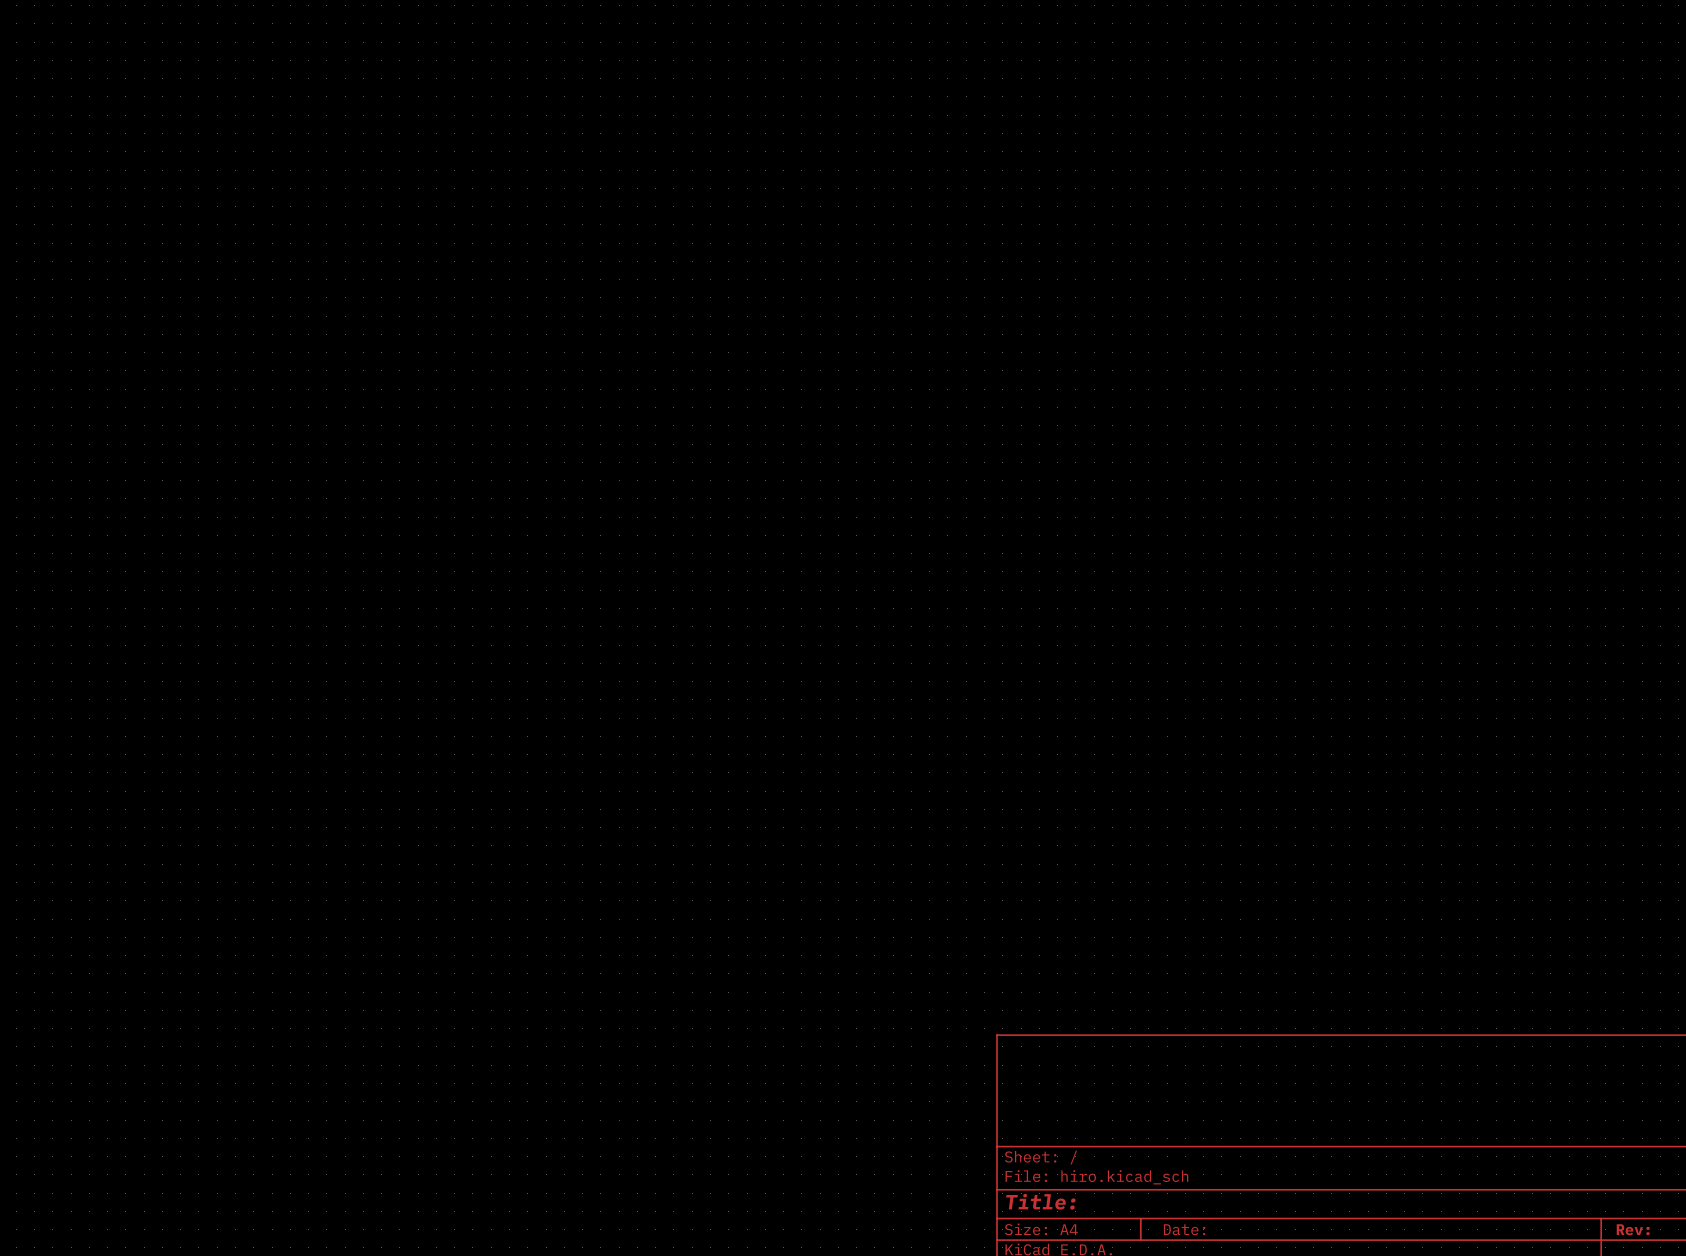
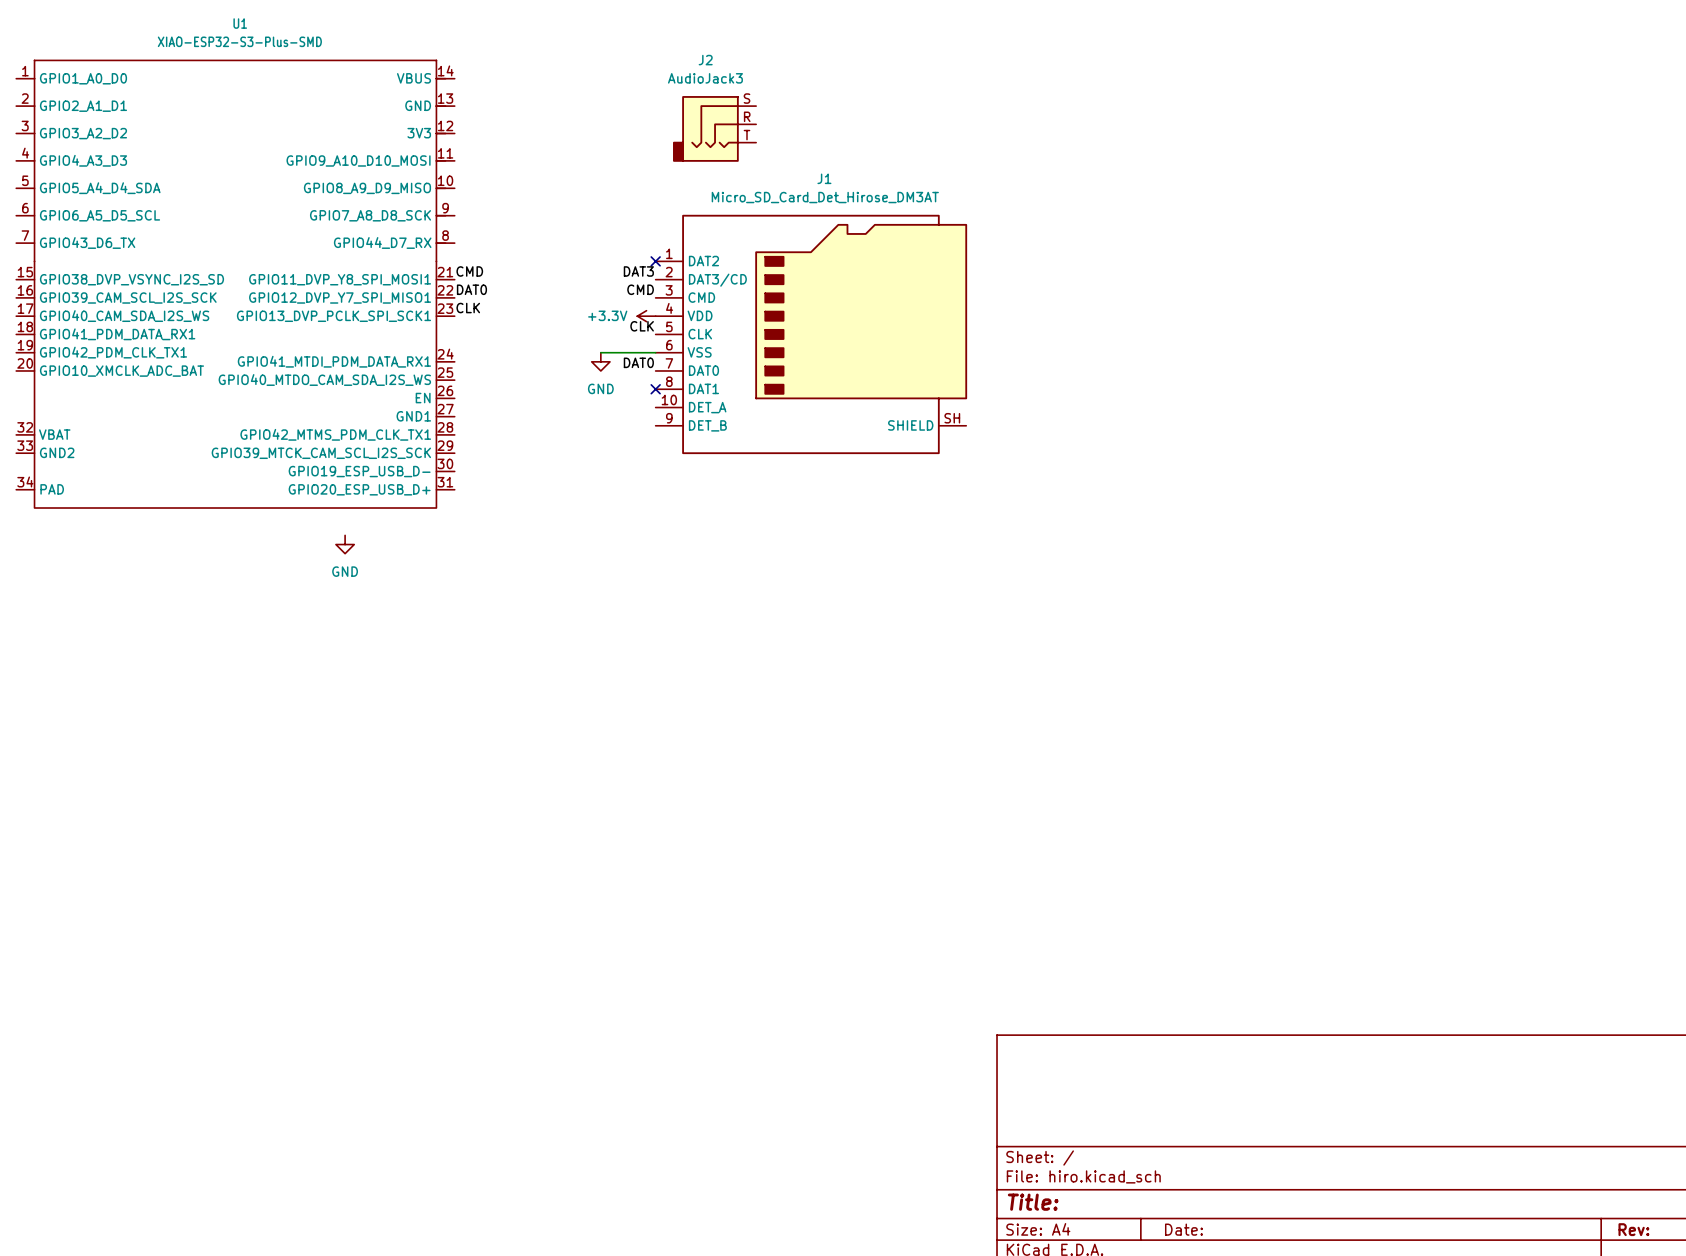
J2: none -> AudioJack3 (714, 128)
no-connect mark: none -> (655, 261)
label: none -> CMD (469, 271)
label: none -> DAT3 (638, 271)
U1: none -> XIAO-ESP32-S3-Plus-SMD (235, 283)
label: none -> DAT0 (471, 289)
label: none -> CMD (640, 289)
label: none -> CLK (468, 308)
power symbol: none -> +3.3V (646, 316)
label: none -> CLK (642, 326)
J1: none -> Micro_SD_Card_Det_Hirose_DM3AT (811, 334)
wire: none -> (600, 352) (655, 352)
power symbol: none -> GND (600, 361)
label: none -> DAT0 (638, 362)
no-connect mark: none -> (655, 389)
power symbol: none -> GND (345, 544)

